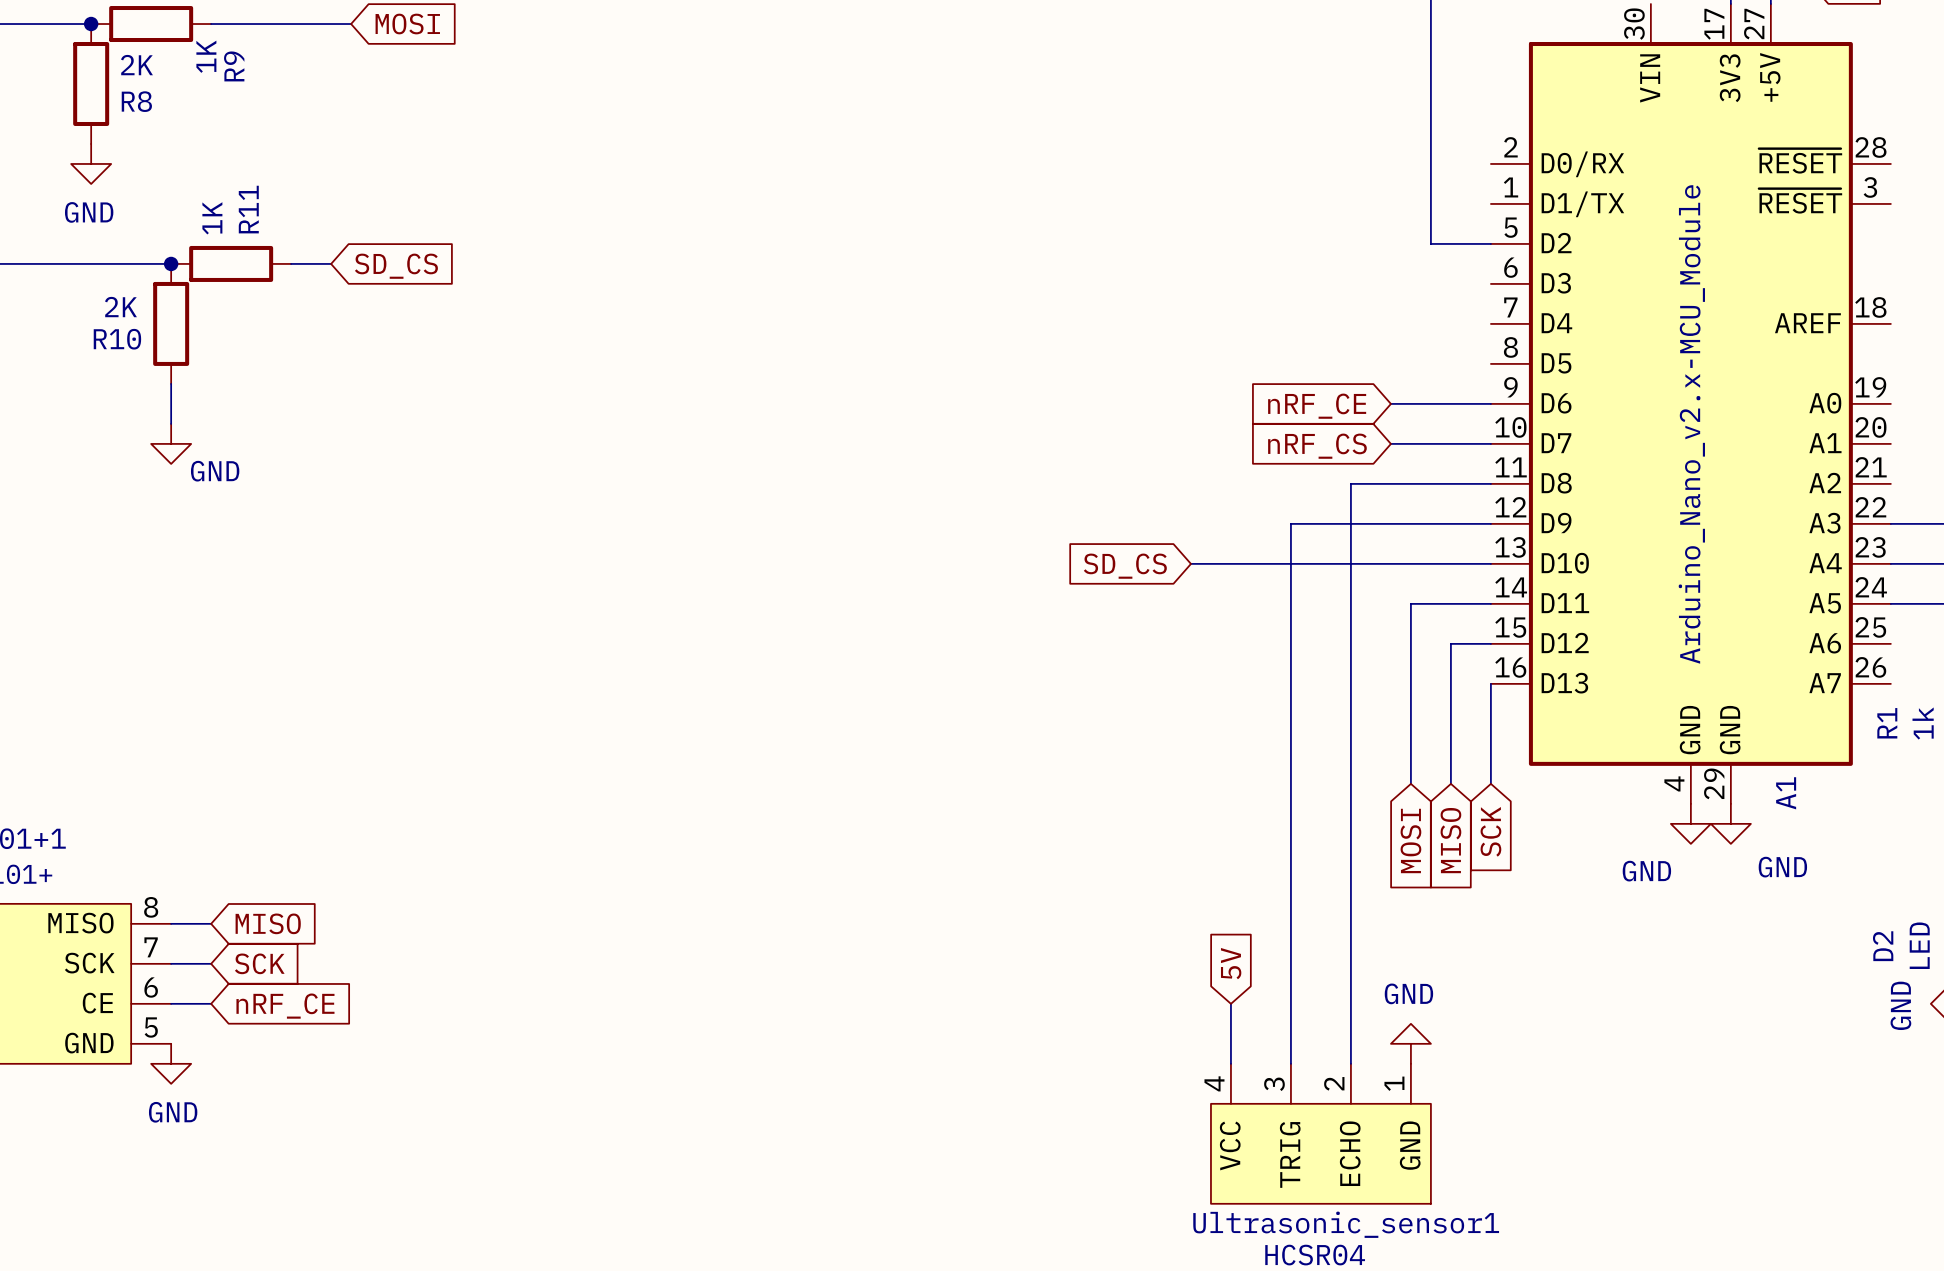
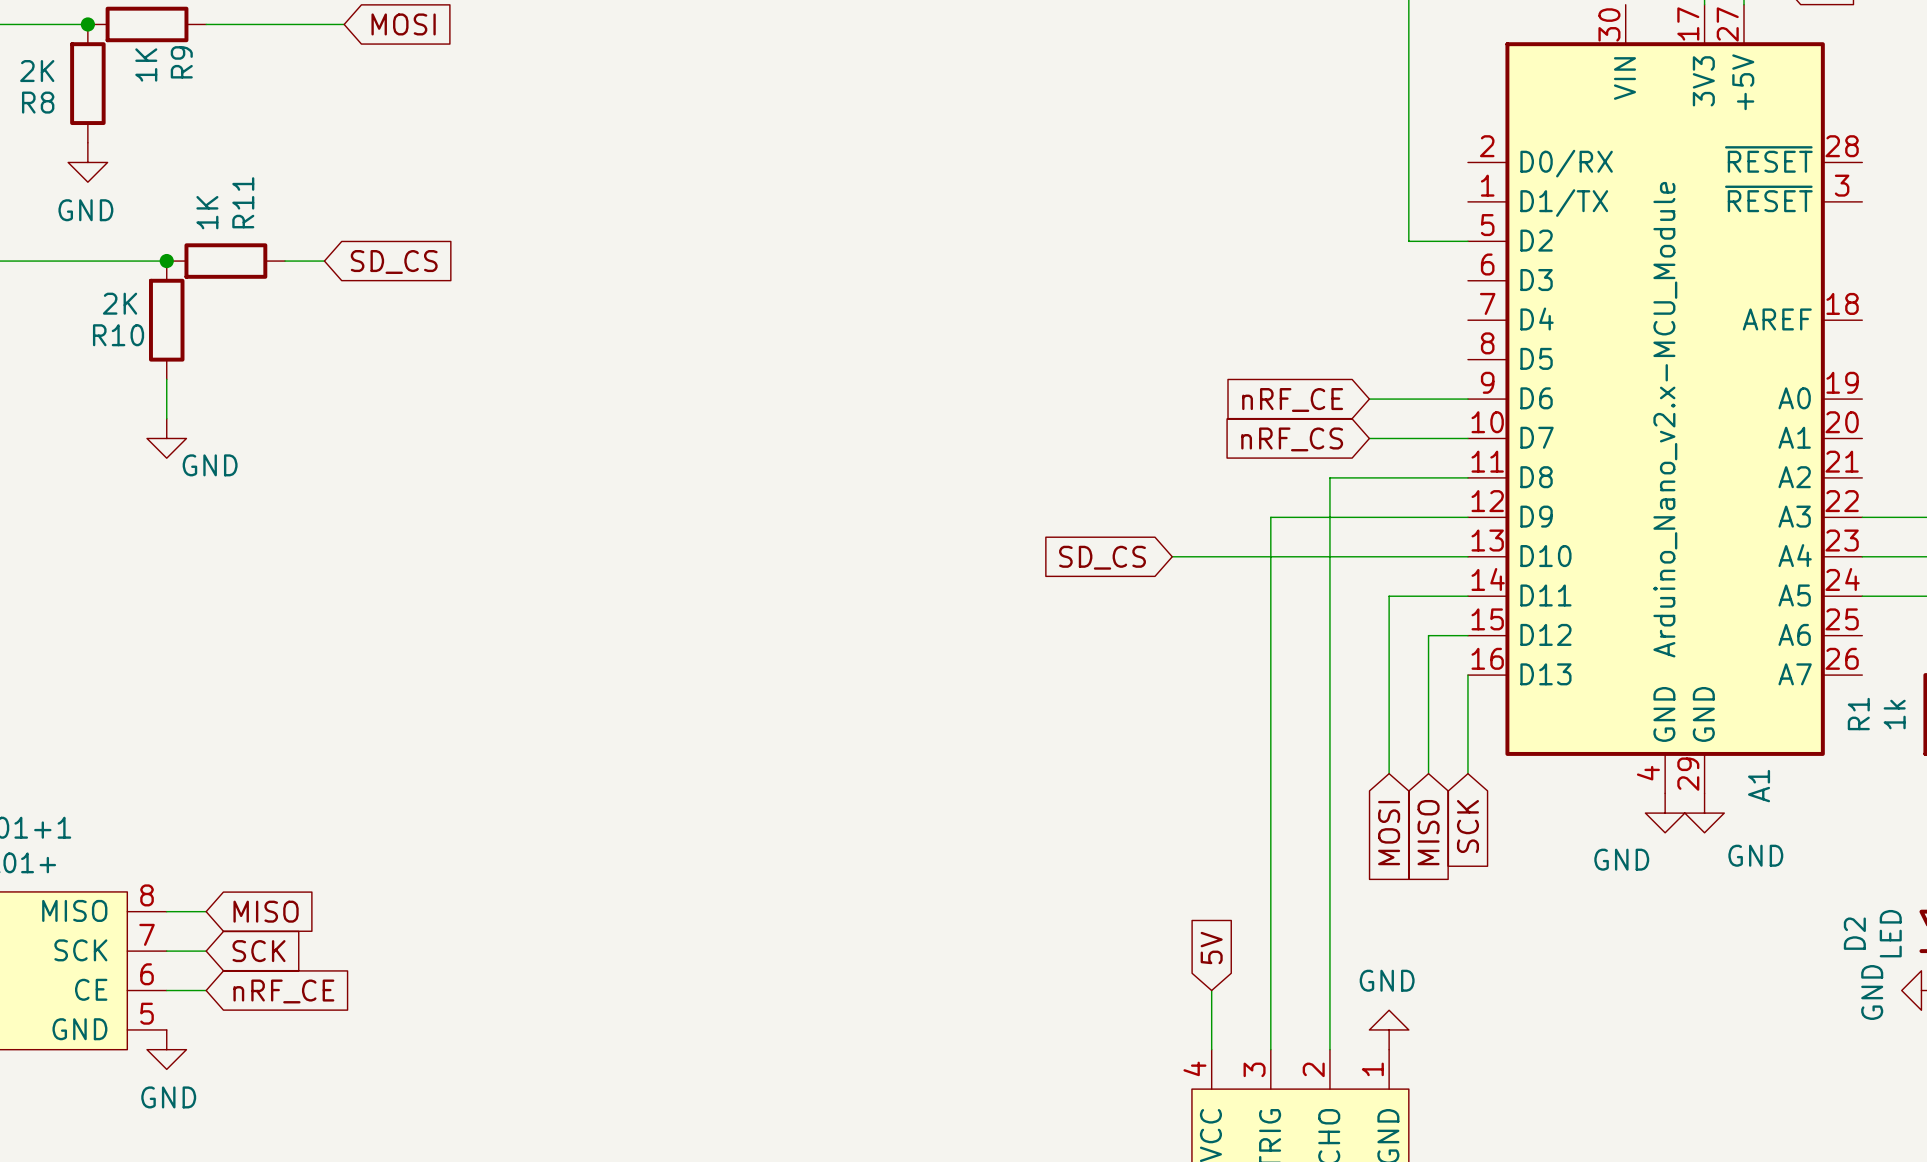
part value position: 1K (206, 56) -> 1K (146, 64)
R8 value position: 2K (136, 65) -> 2K (37, 71)
R9 name position: R9 (234, 66) -> R9 (181, 62)
R8 name position: R8 (136, 101) -> R8 (38, 102)

